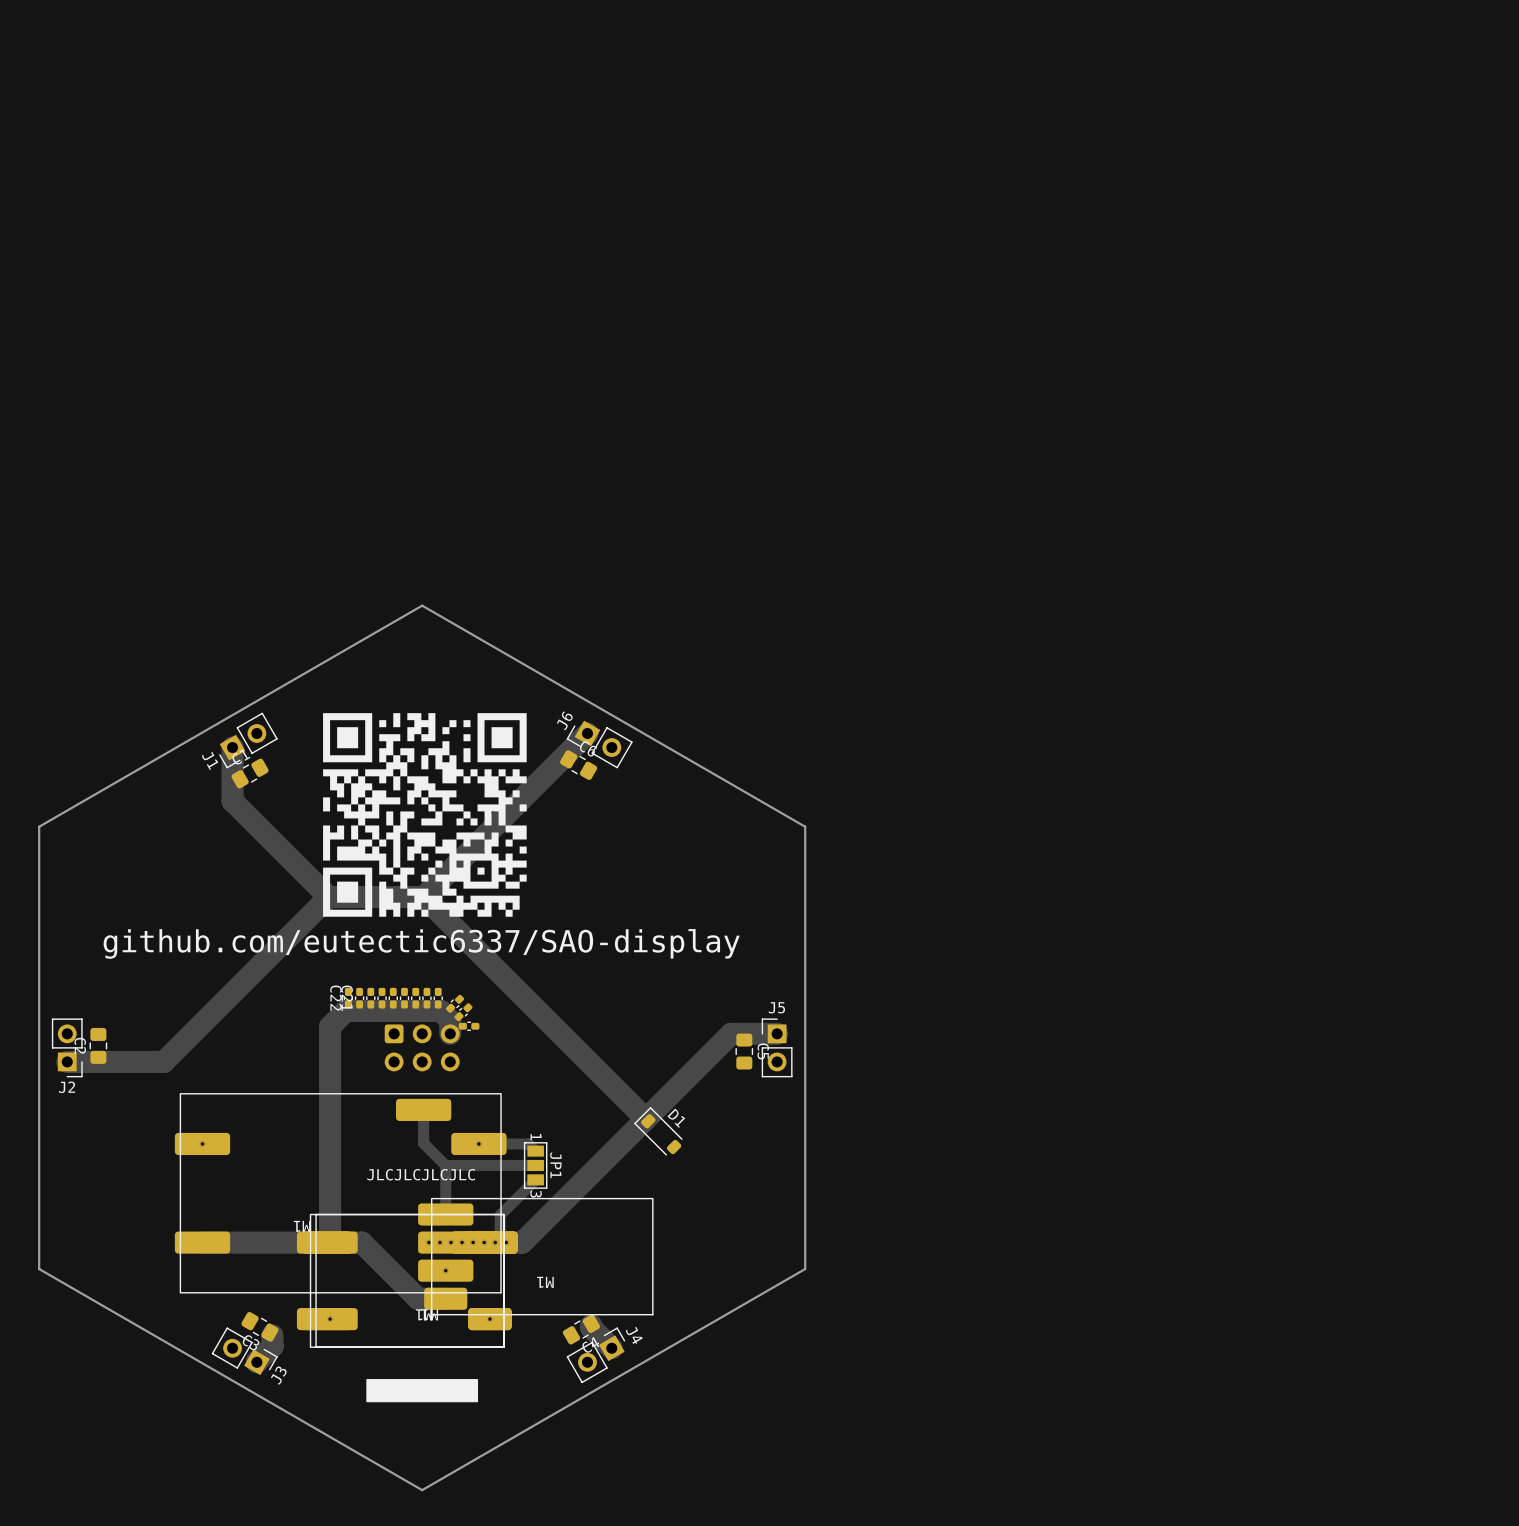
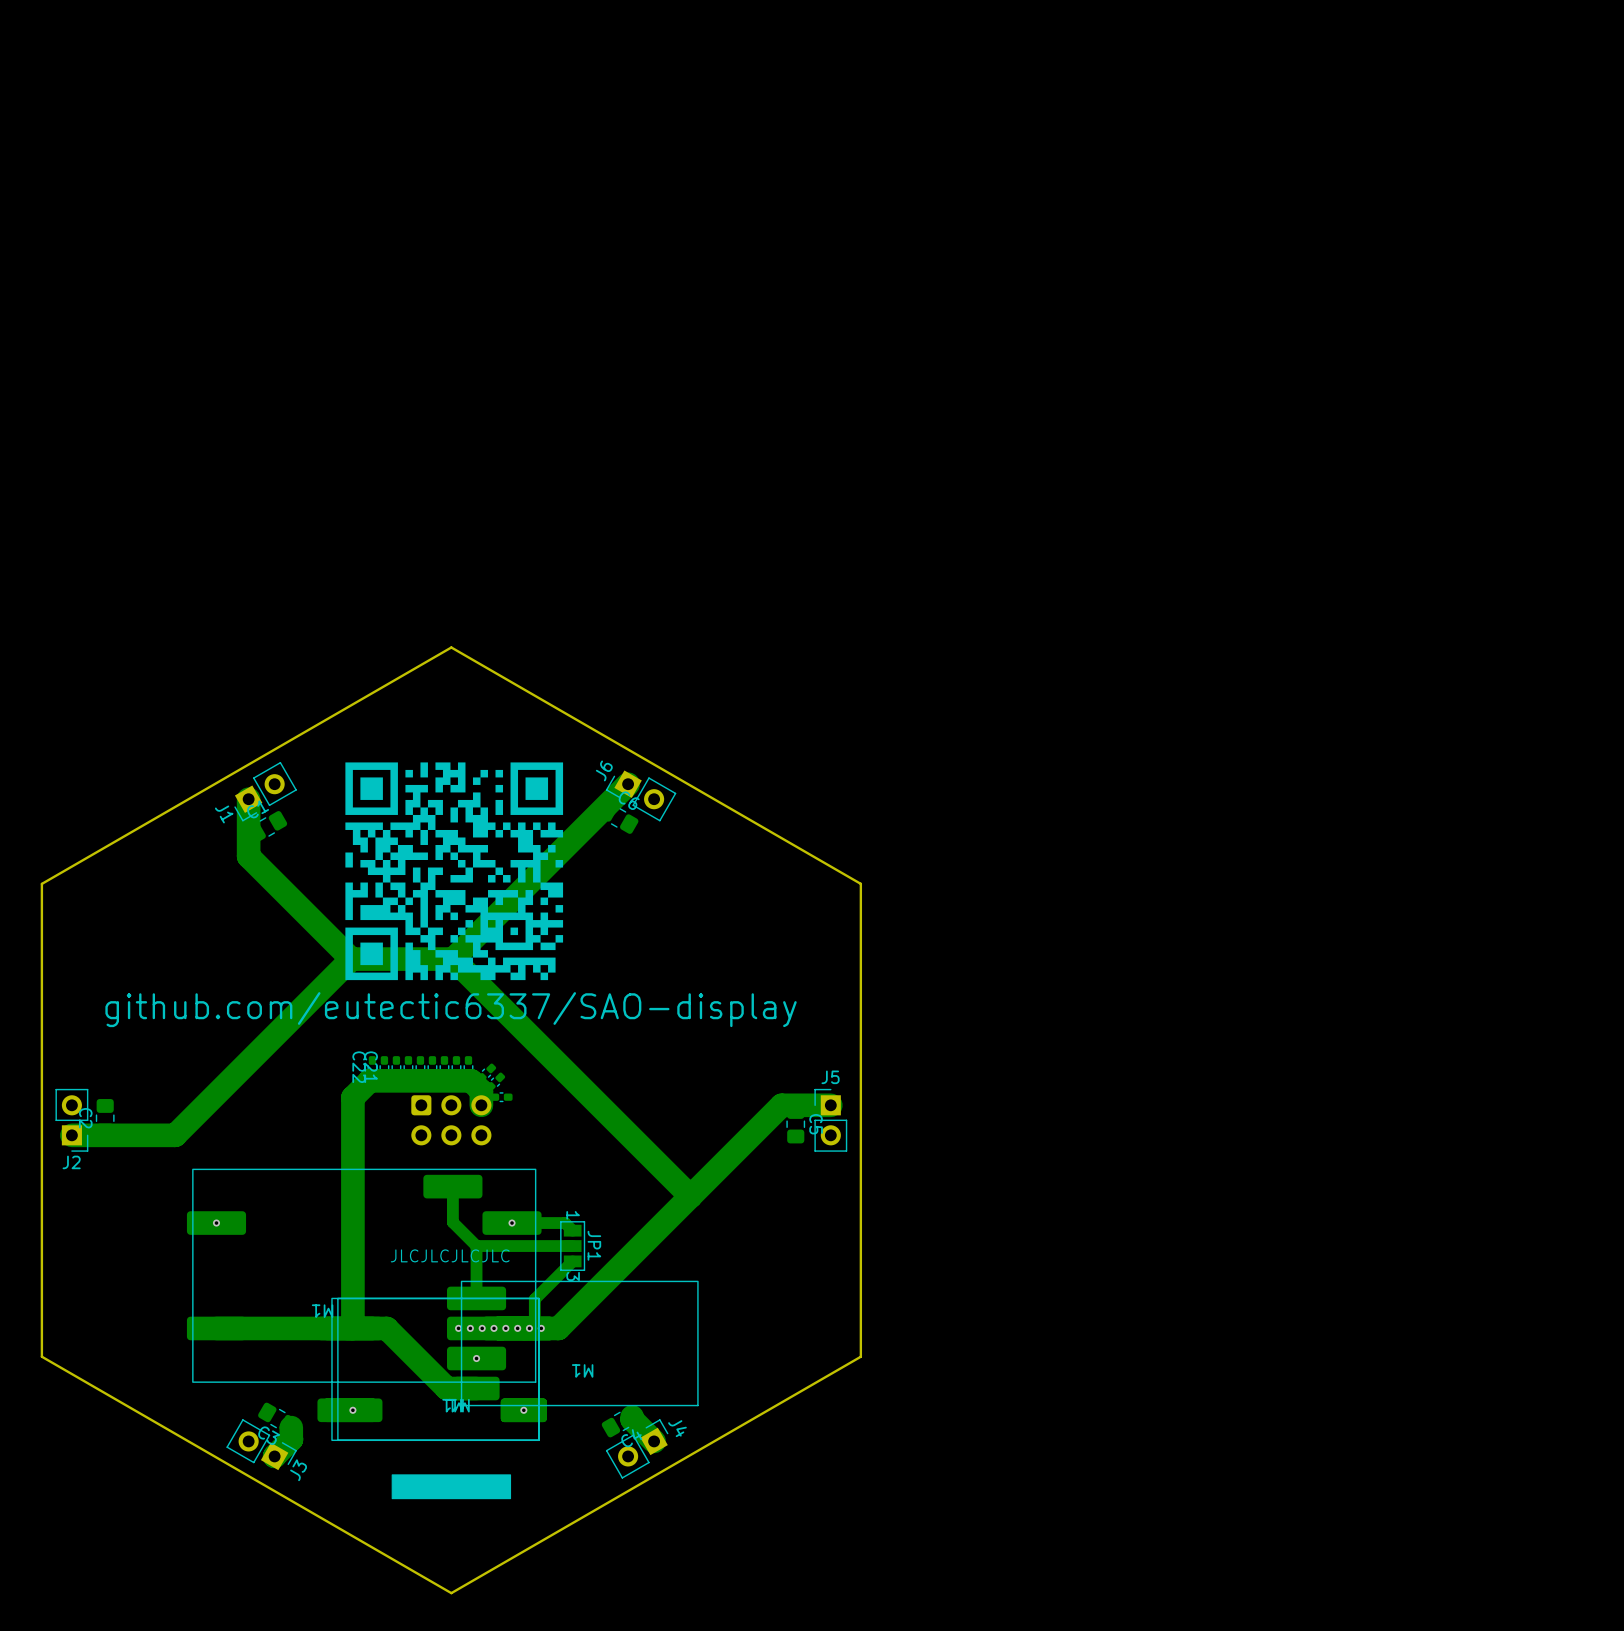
D1: (658, 1131) -> none

